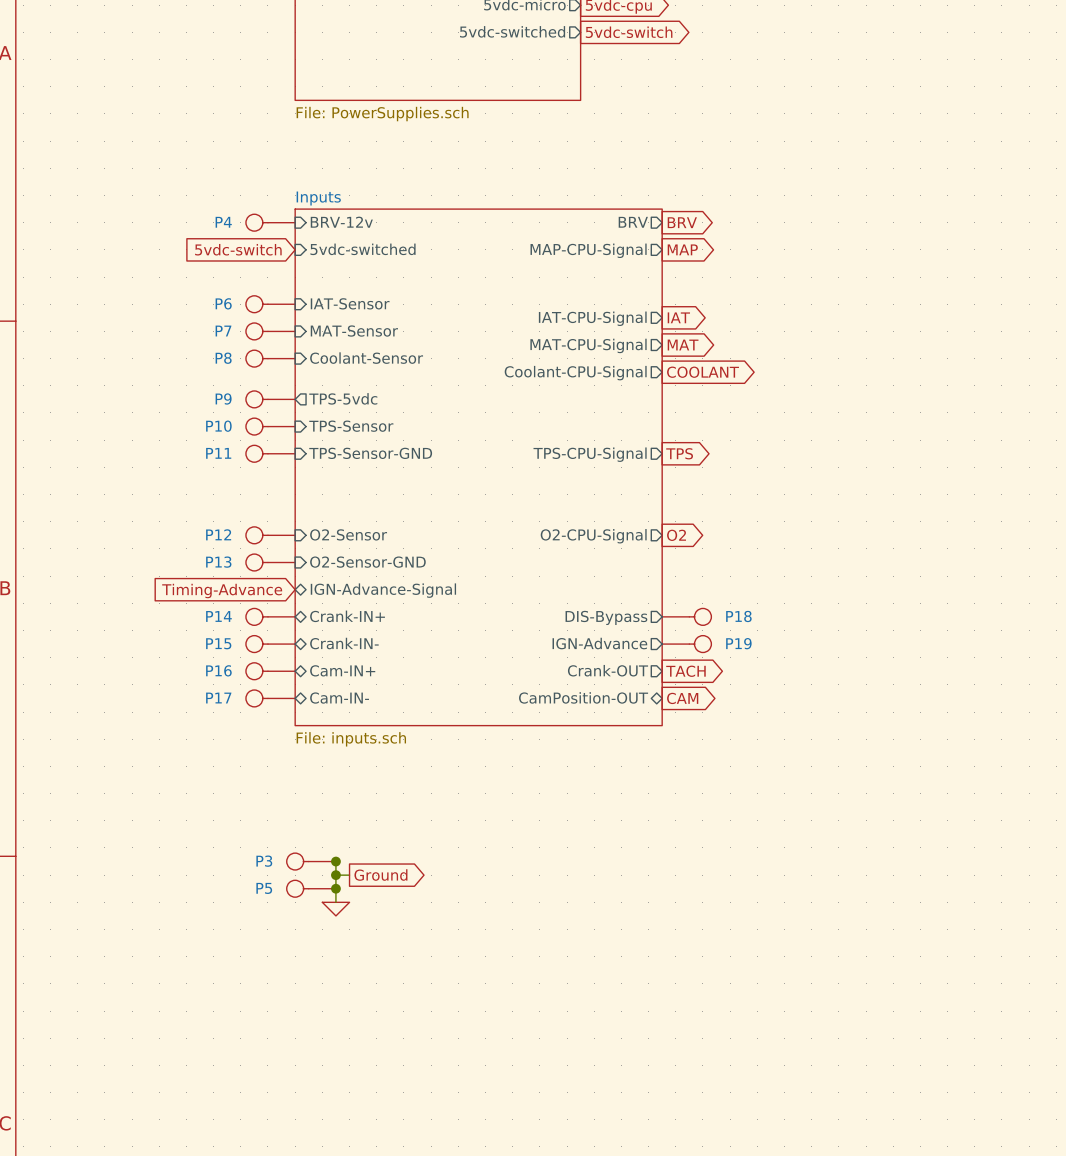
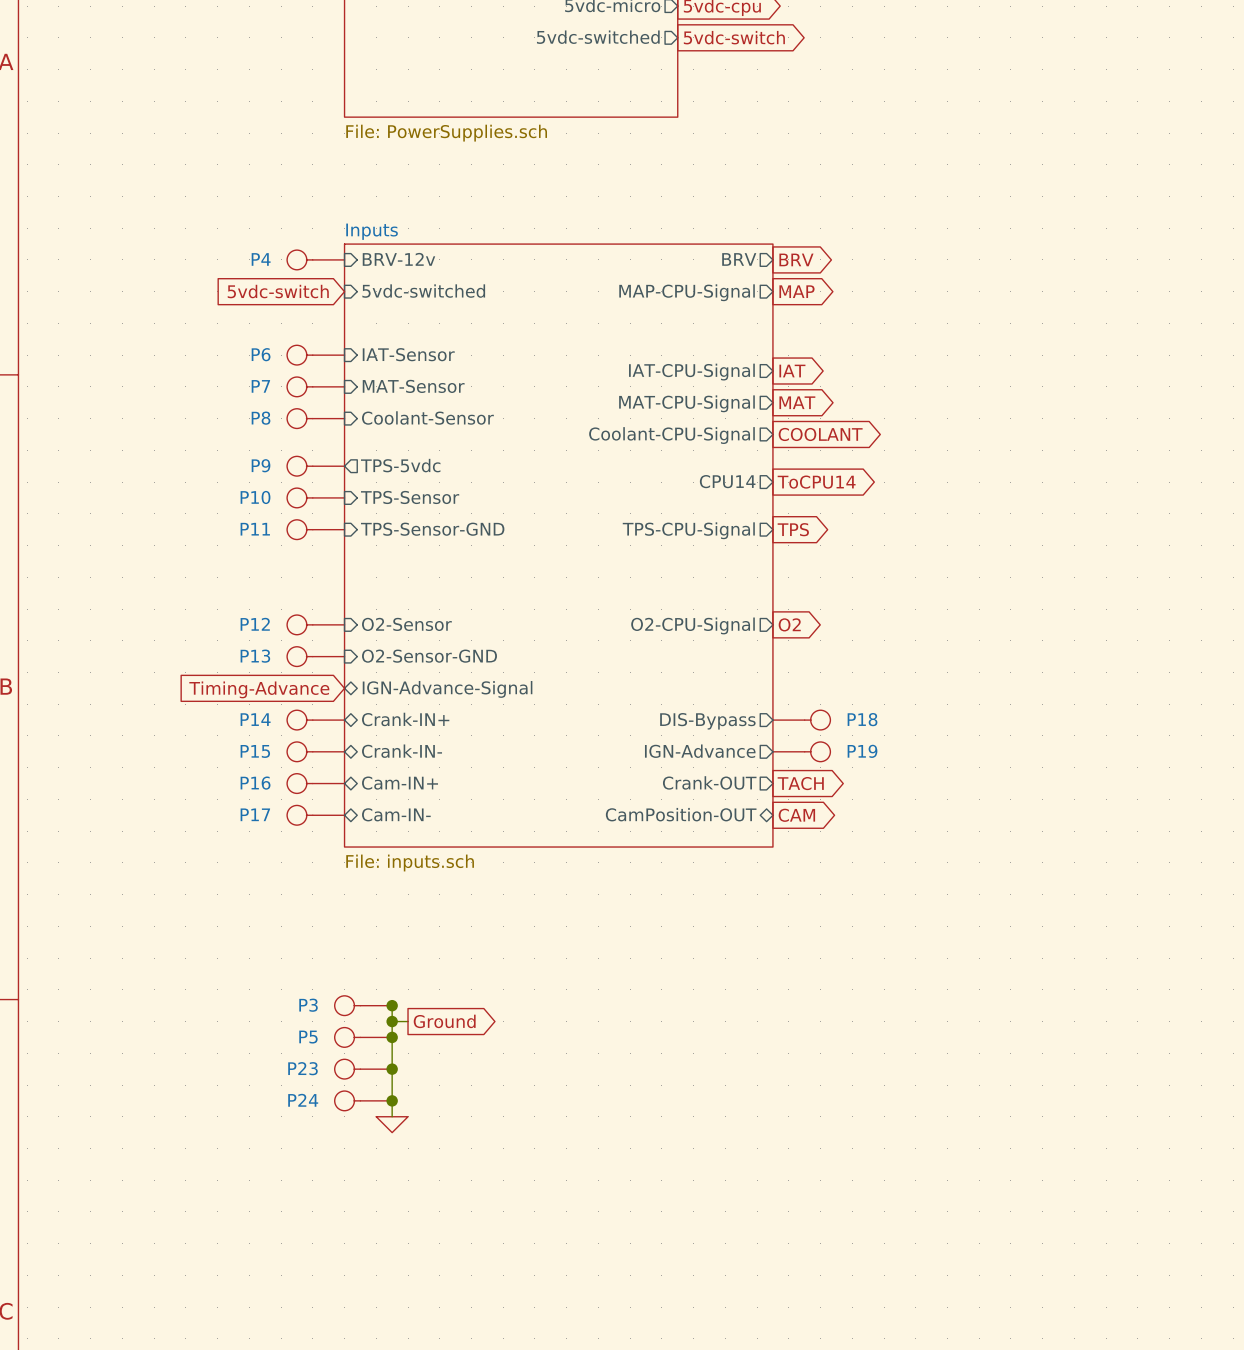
sheet pin: none -> CPU14 (727, 481)
global label: none -> ToCPU14 (816, 482)
wire: none -> (392, 1053) (392, 1116)
power symbol position: (335, 909) -> (392, 1124)
P23: none -> (363, 1069)
junction: none -> (392, 1069)
P24: none -> (363, 1100)
junction: none -> (392, 1100)

